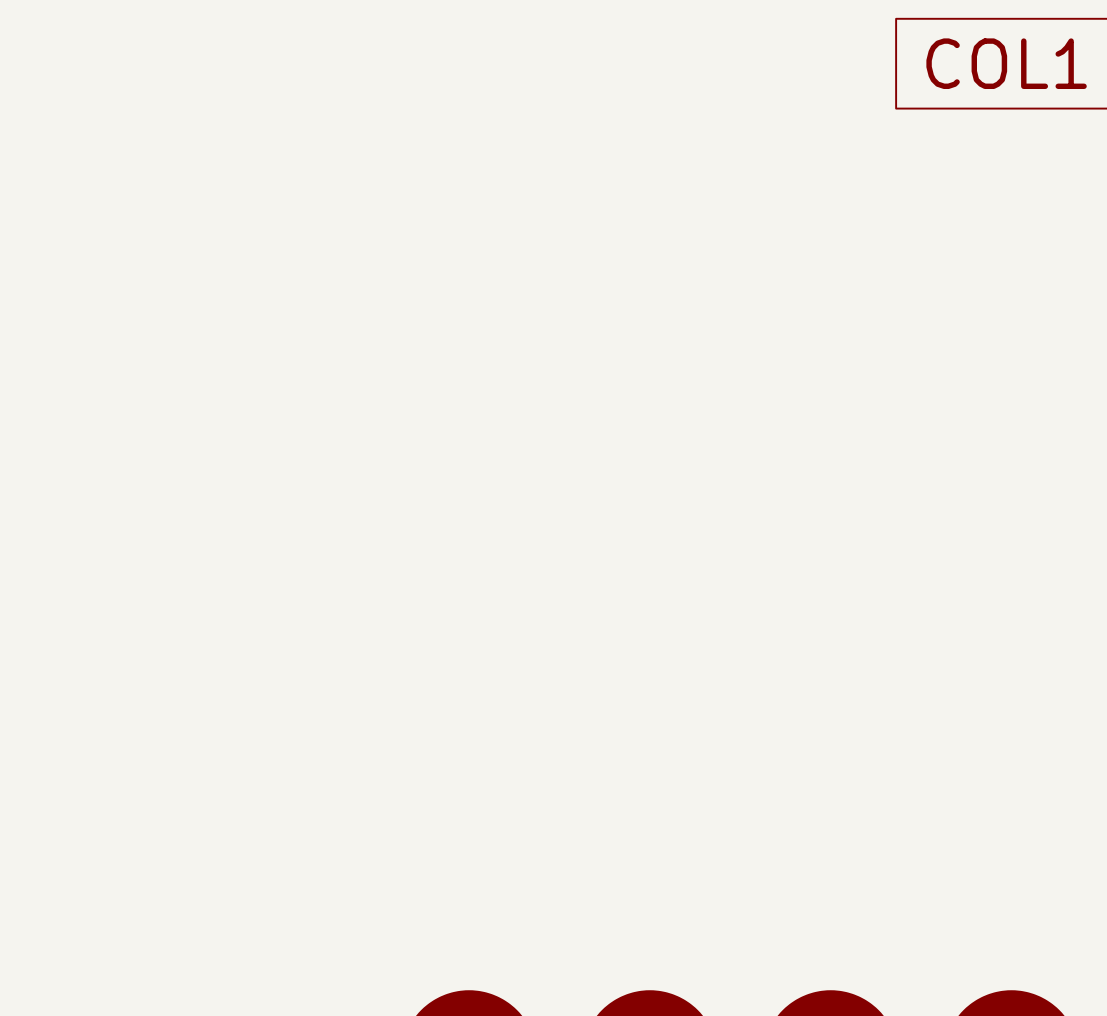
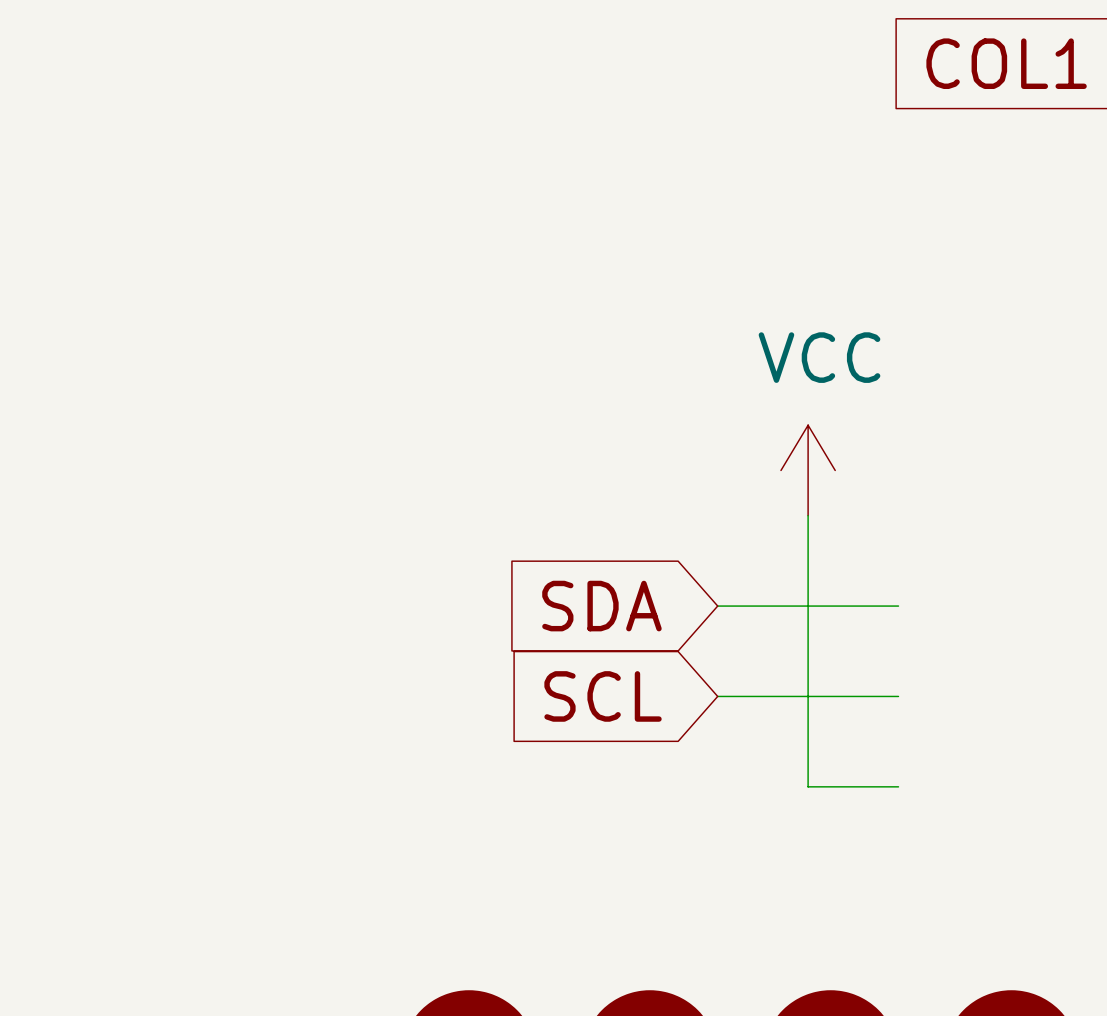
power symbol: none -> VCC (808, 470)
wire: none -> (808, 515) (808, 786) (898, 786)
global label: none -> SDA (601, 606)
wire: none -> (717, 606) (898, 606)
global label: none -> SCL (603, 696)
wire: none -> (717, 696) (898, 696)

